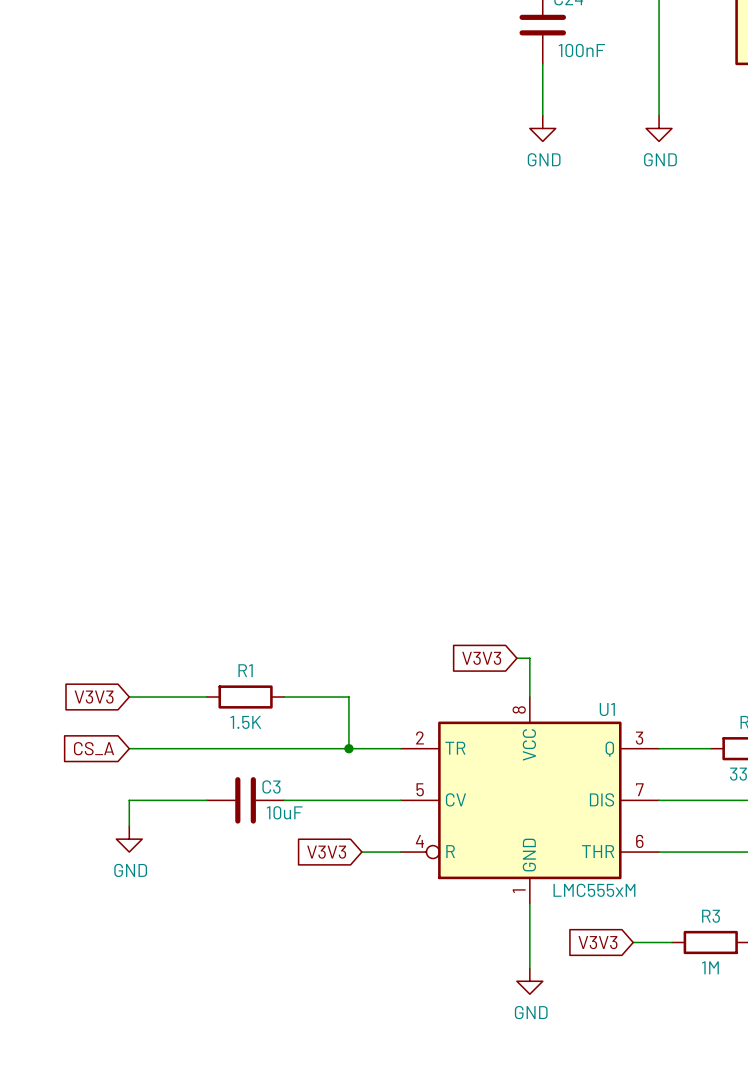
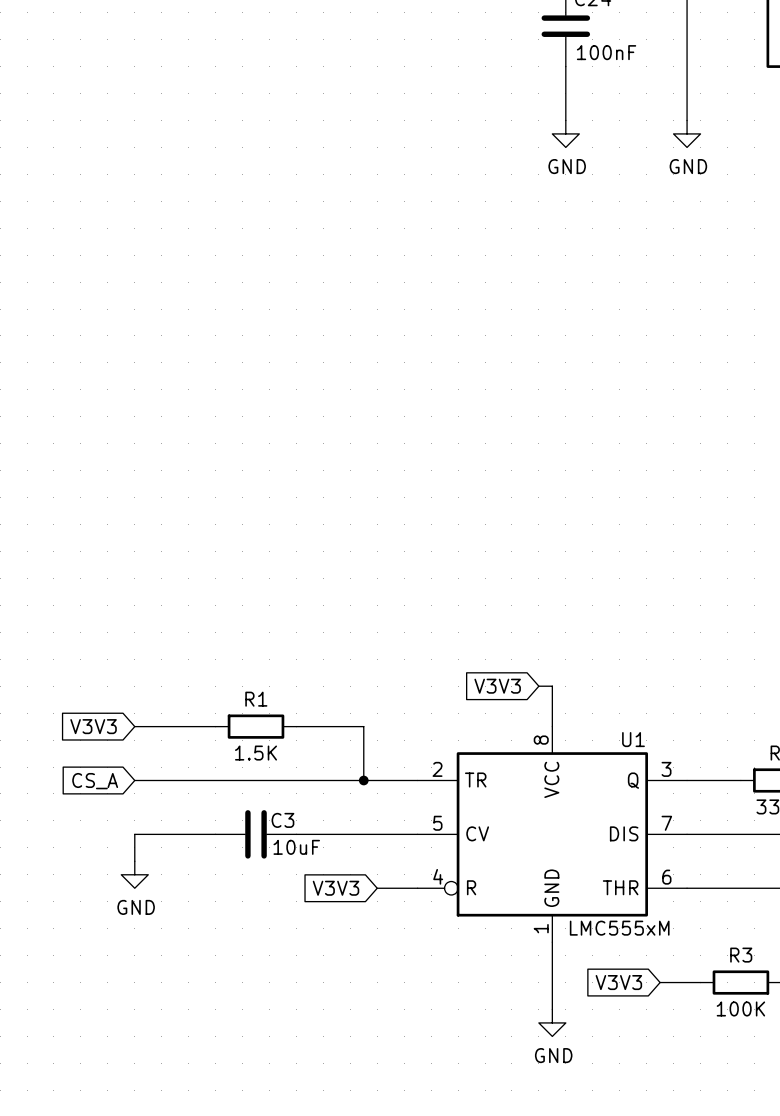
R3 value: 1M (710, 967) -> 100K (740, 1008)

